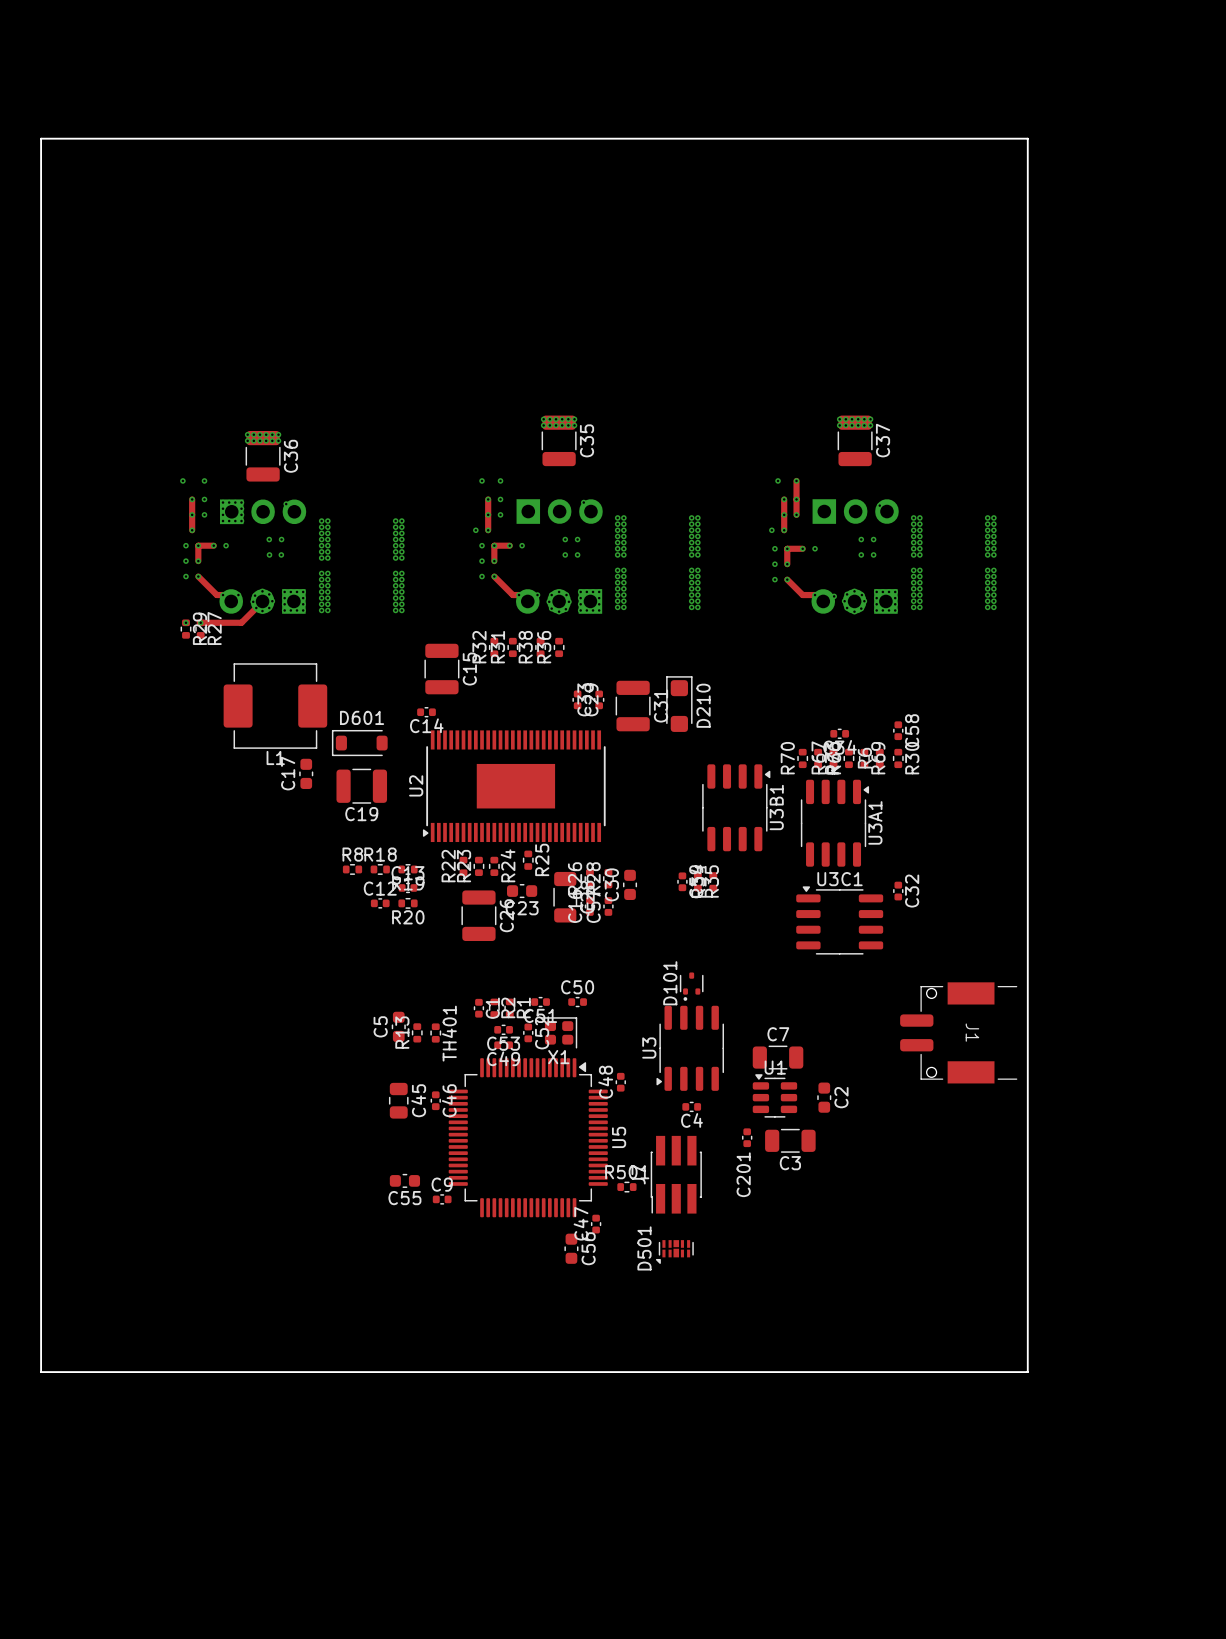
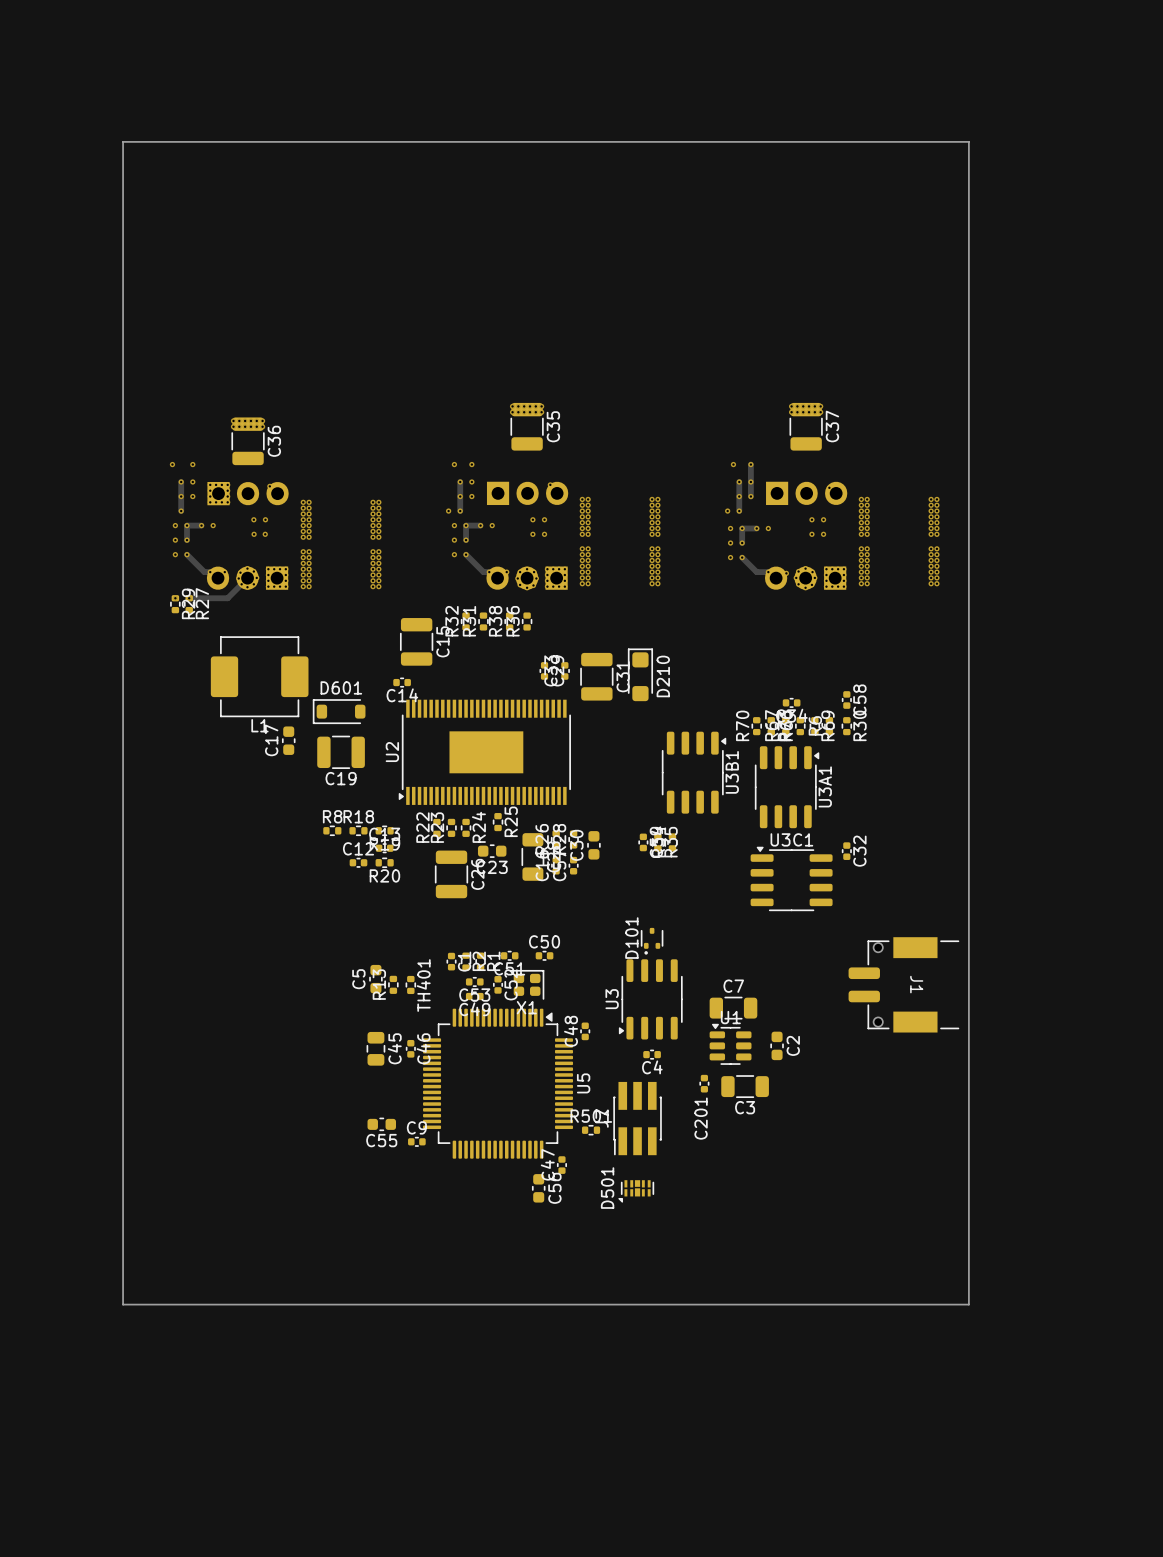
board edge: (130, 138) (41, 138) (41, 1372) (130, 1372) -> (123, 141) (123, 1304)

